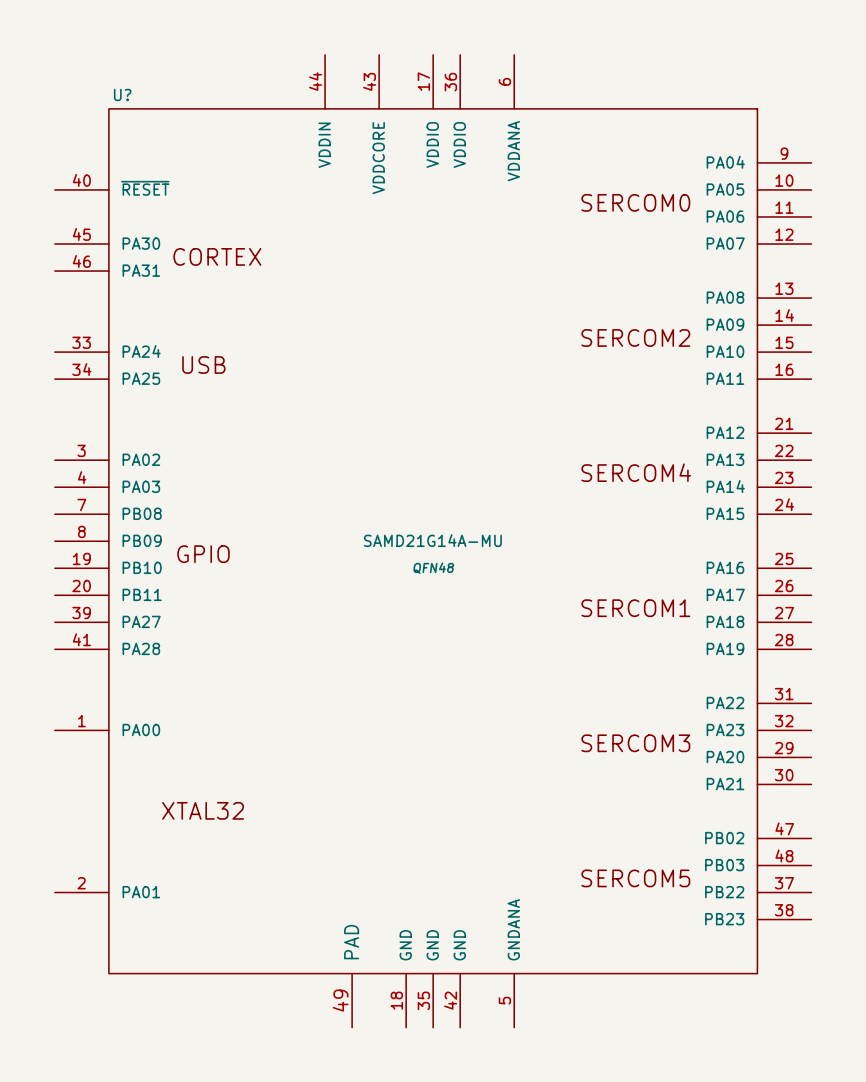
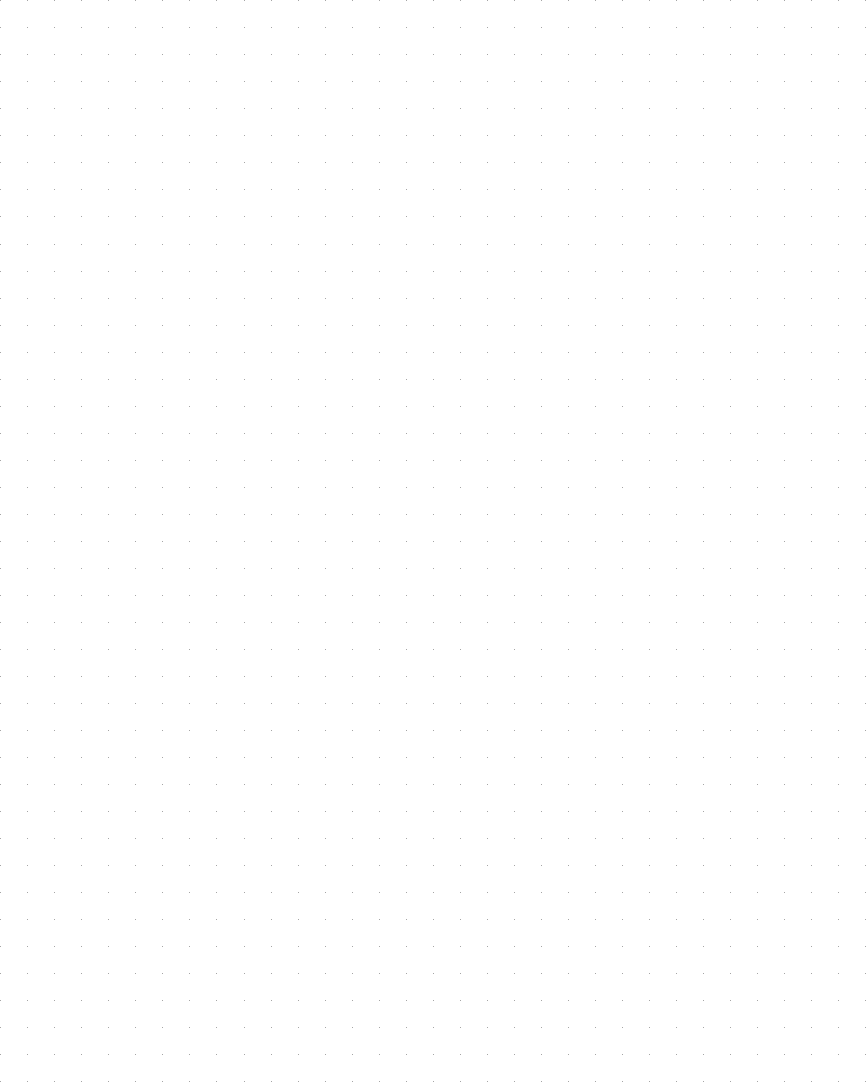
U?: SAMD21G14A-MU (433, 541) -> none

